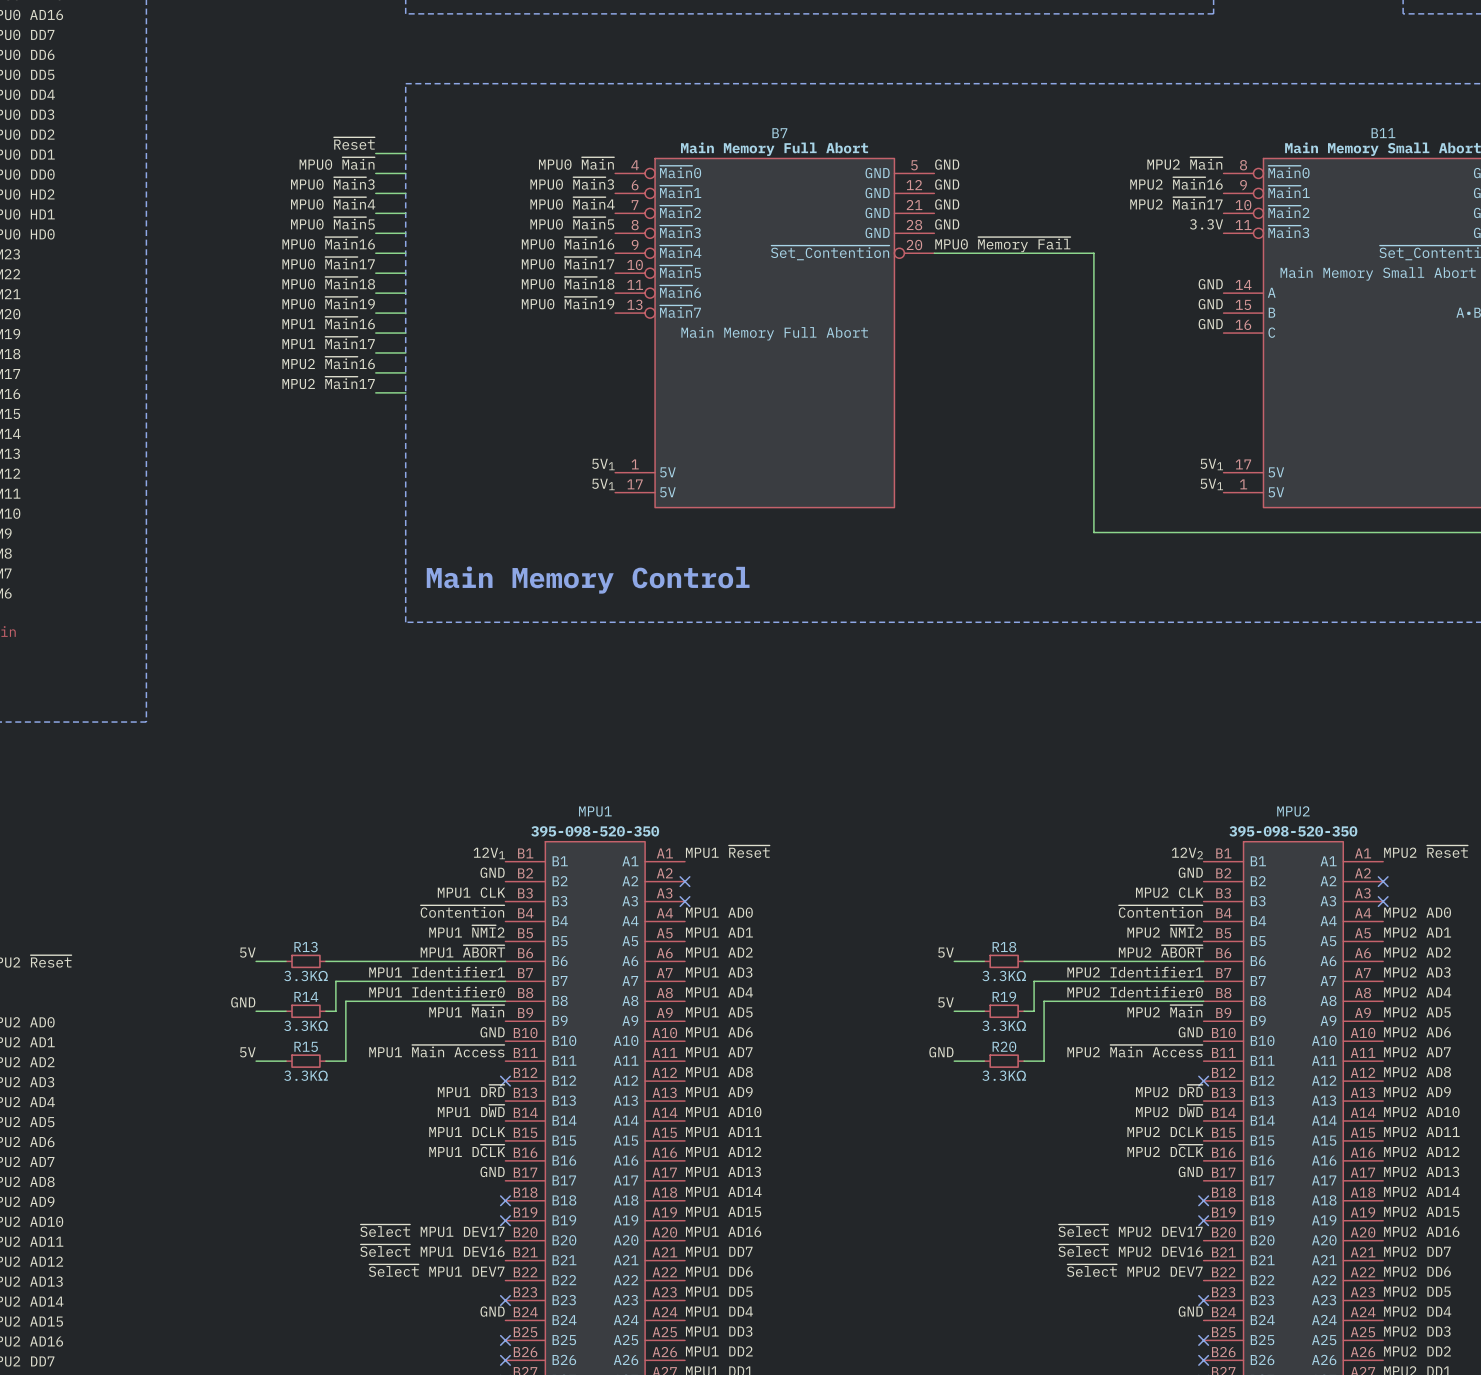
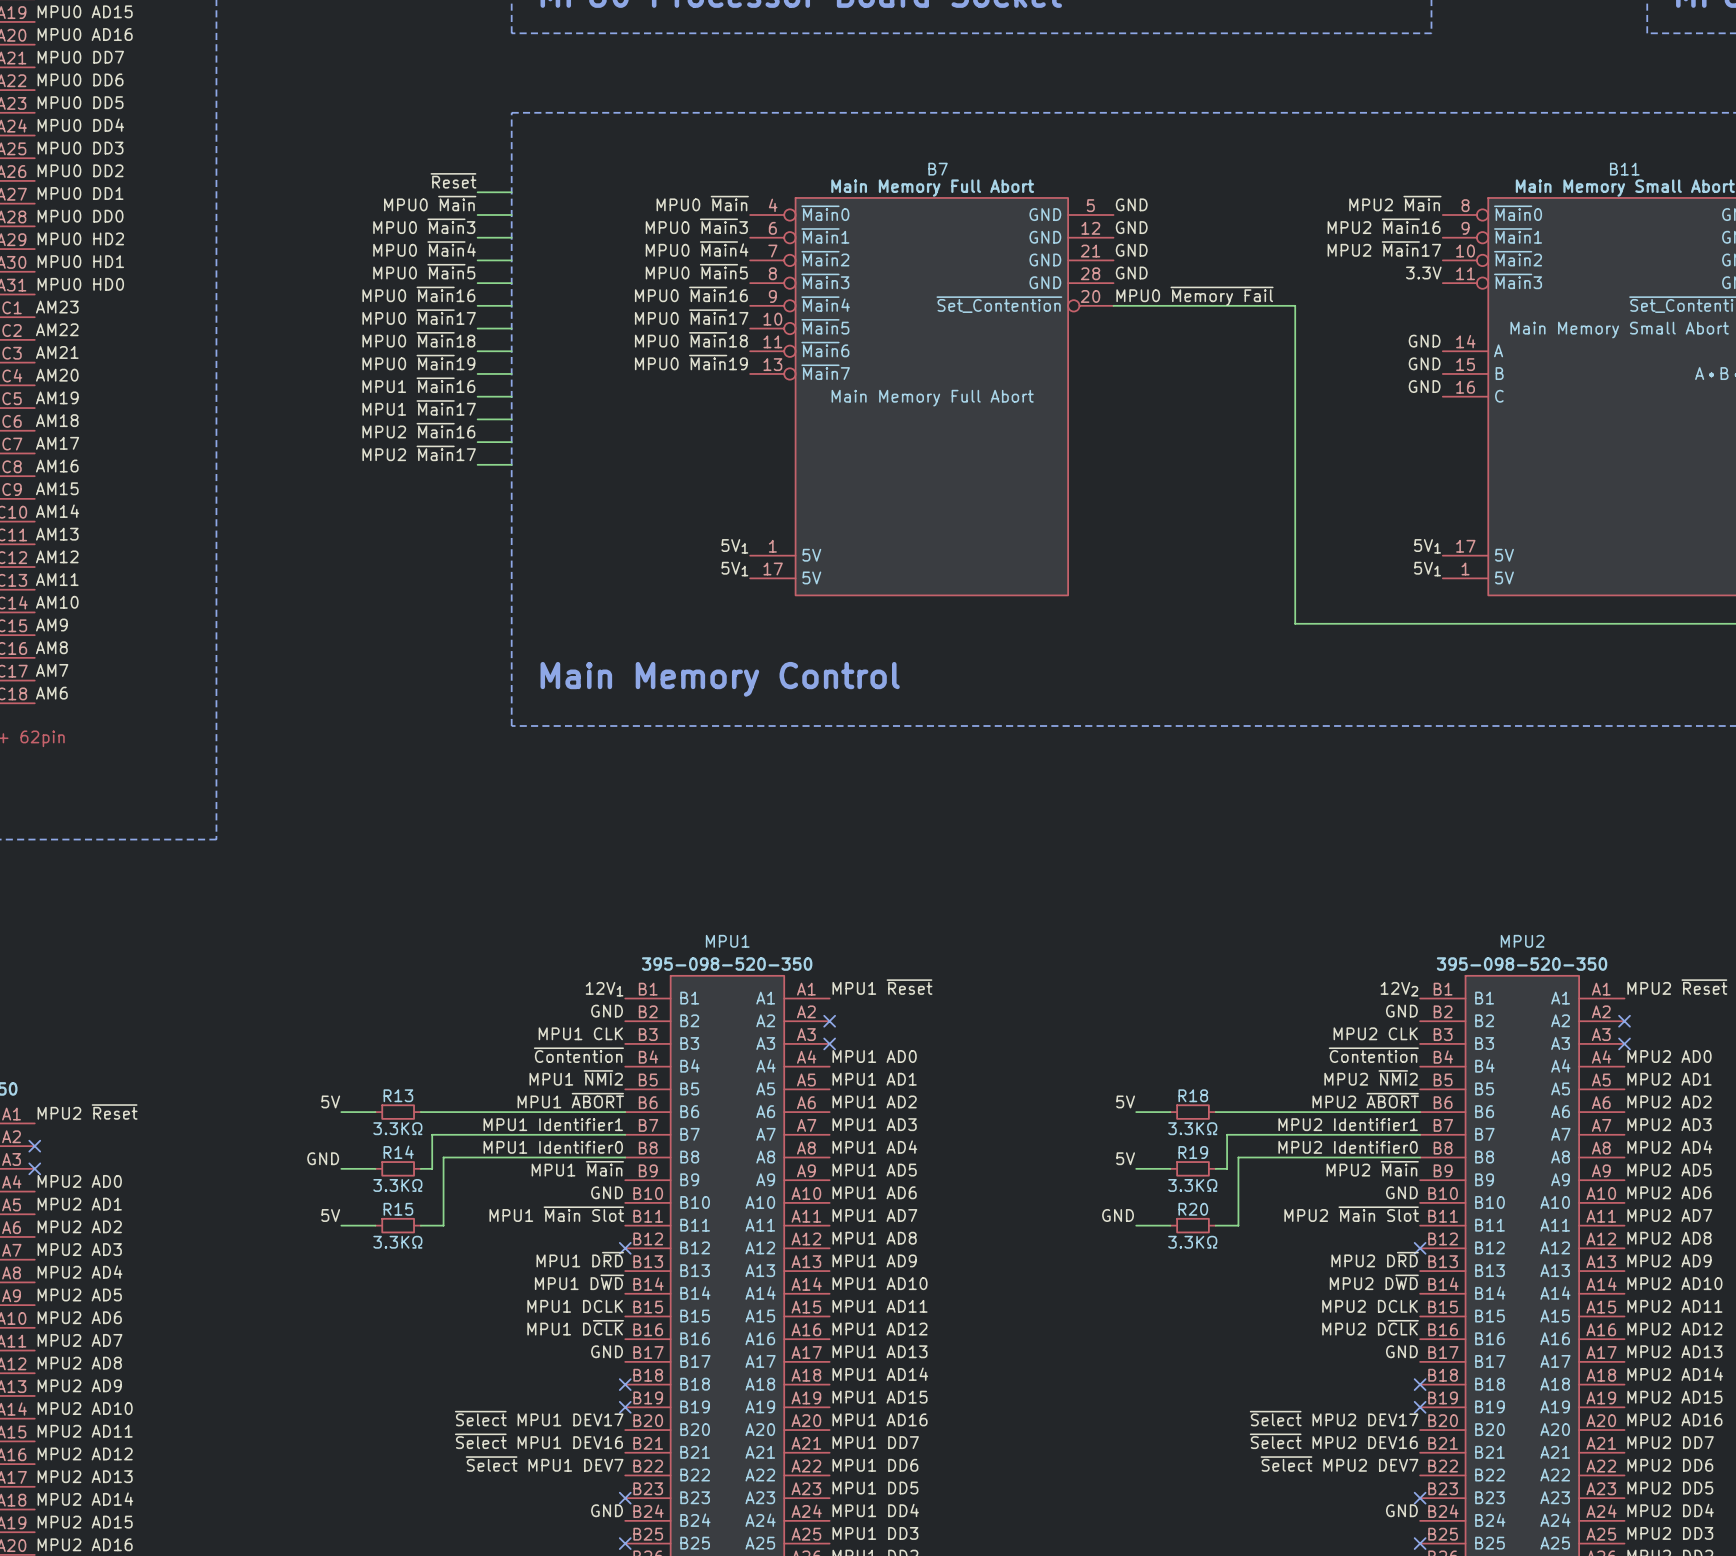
label: MPU1 ~{Main Access} (436, 1051) -> MPU1 ~{Main Slot} (556, 1214)
label: MPU2 ~{Main Access} (1135, 1051) -> MPU2 ~{Main Slot} (1351, 1214)

